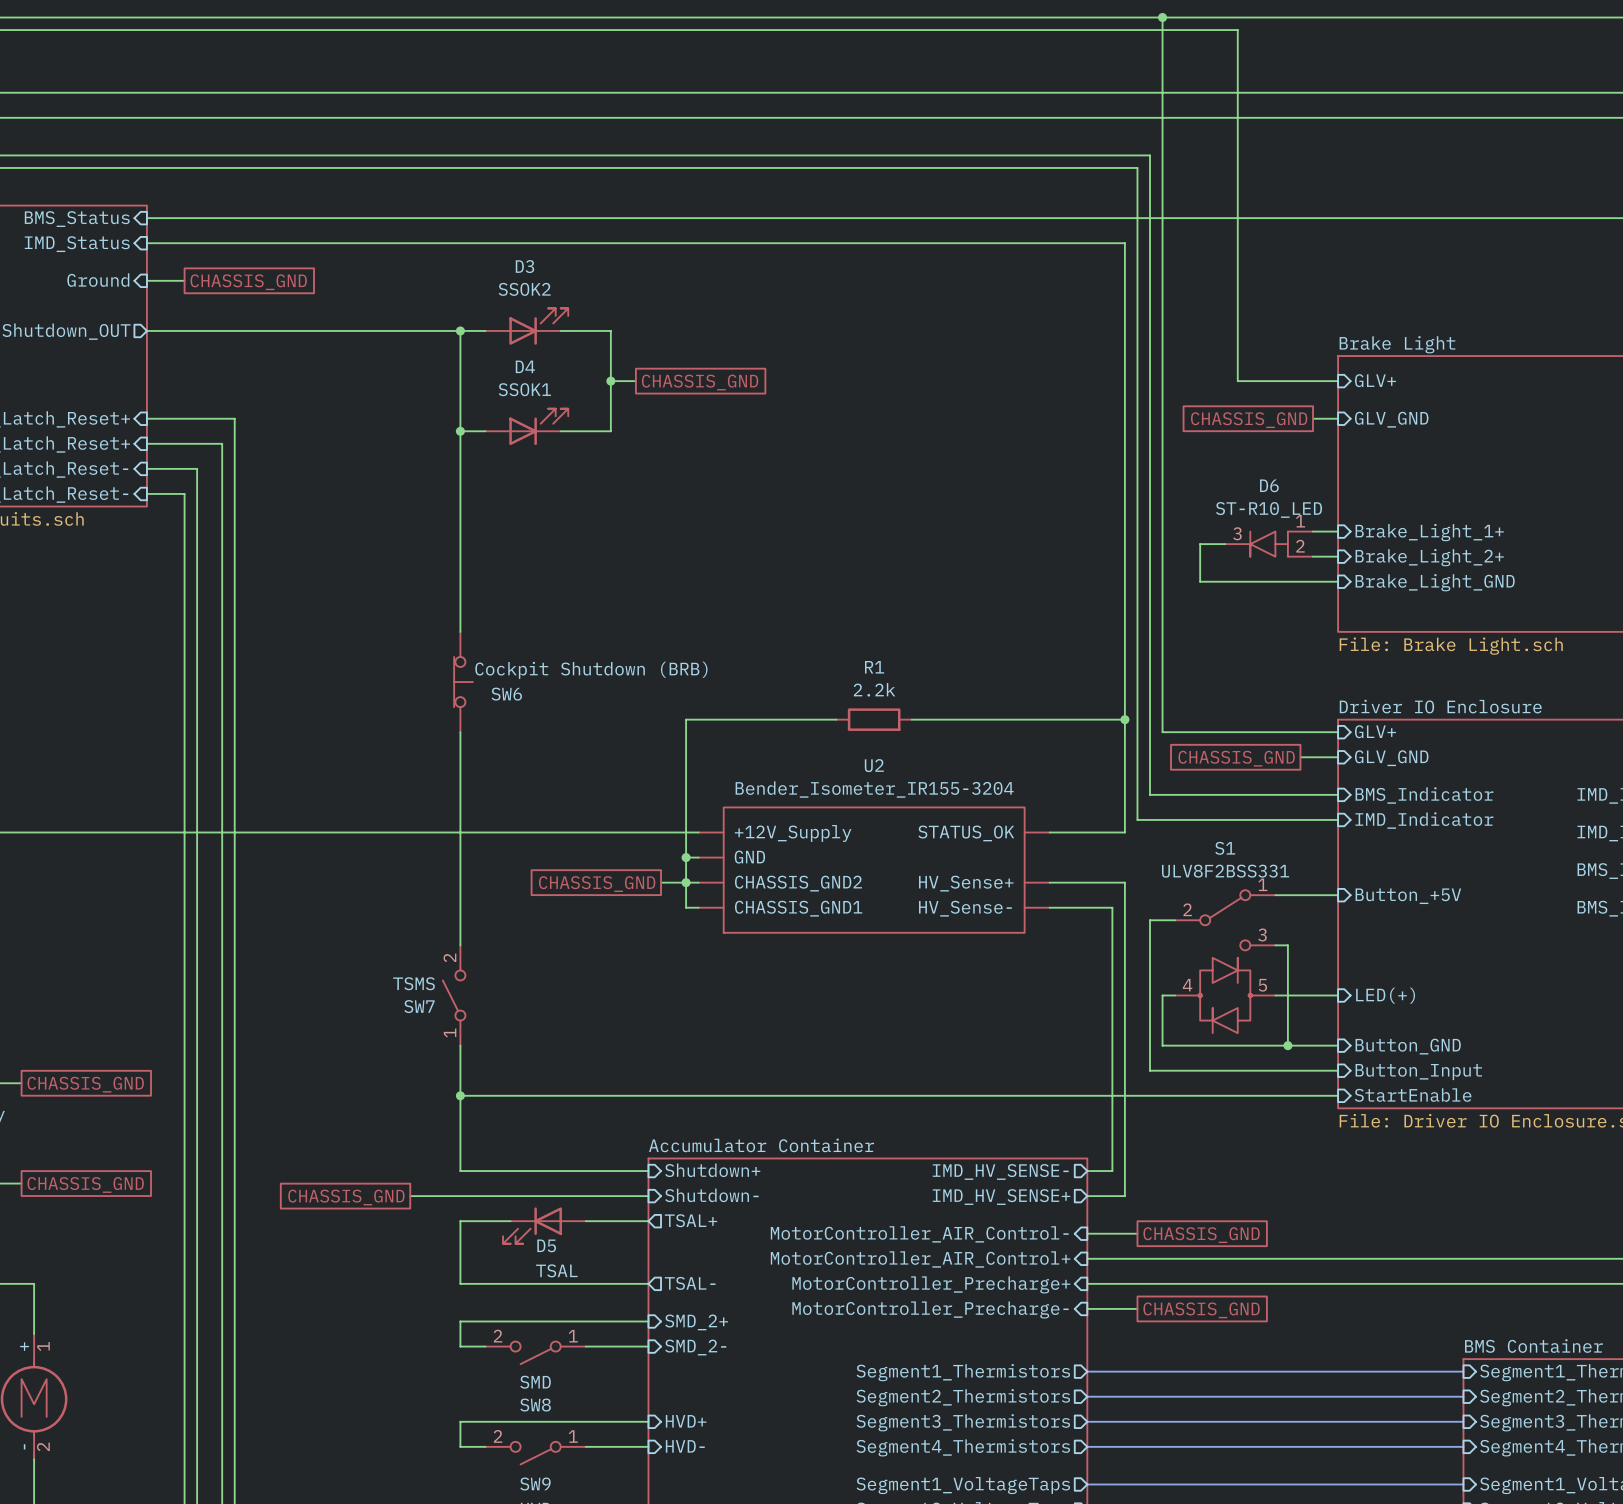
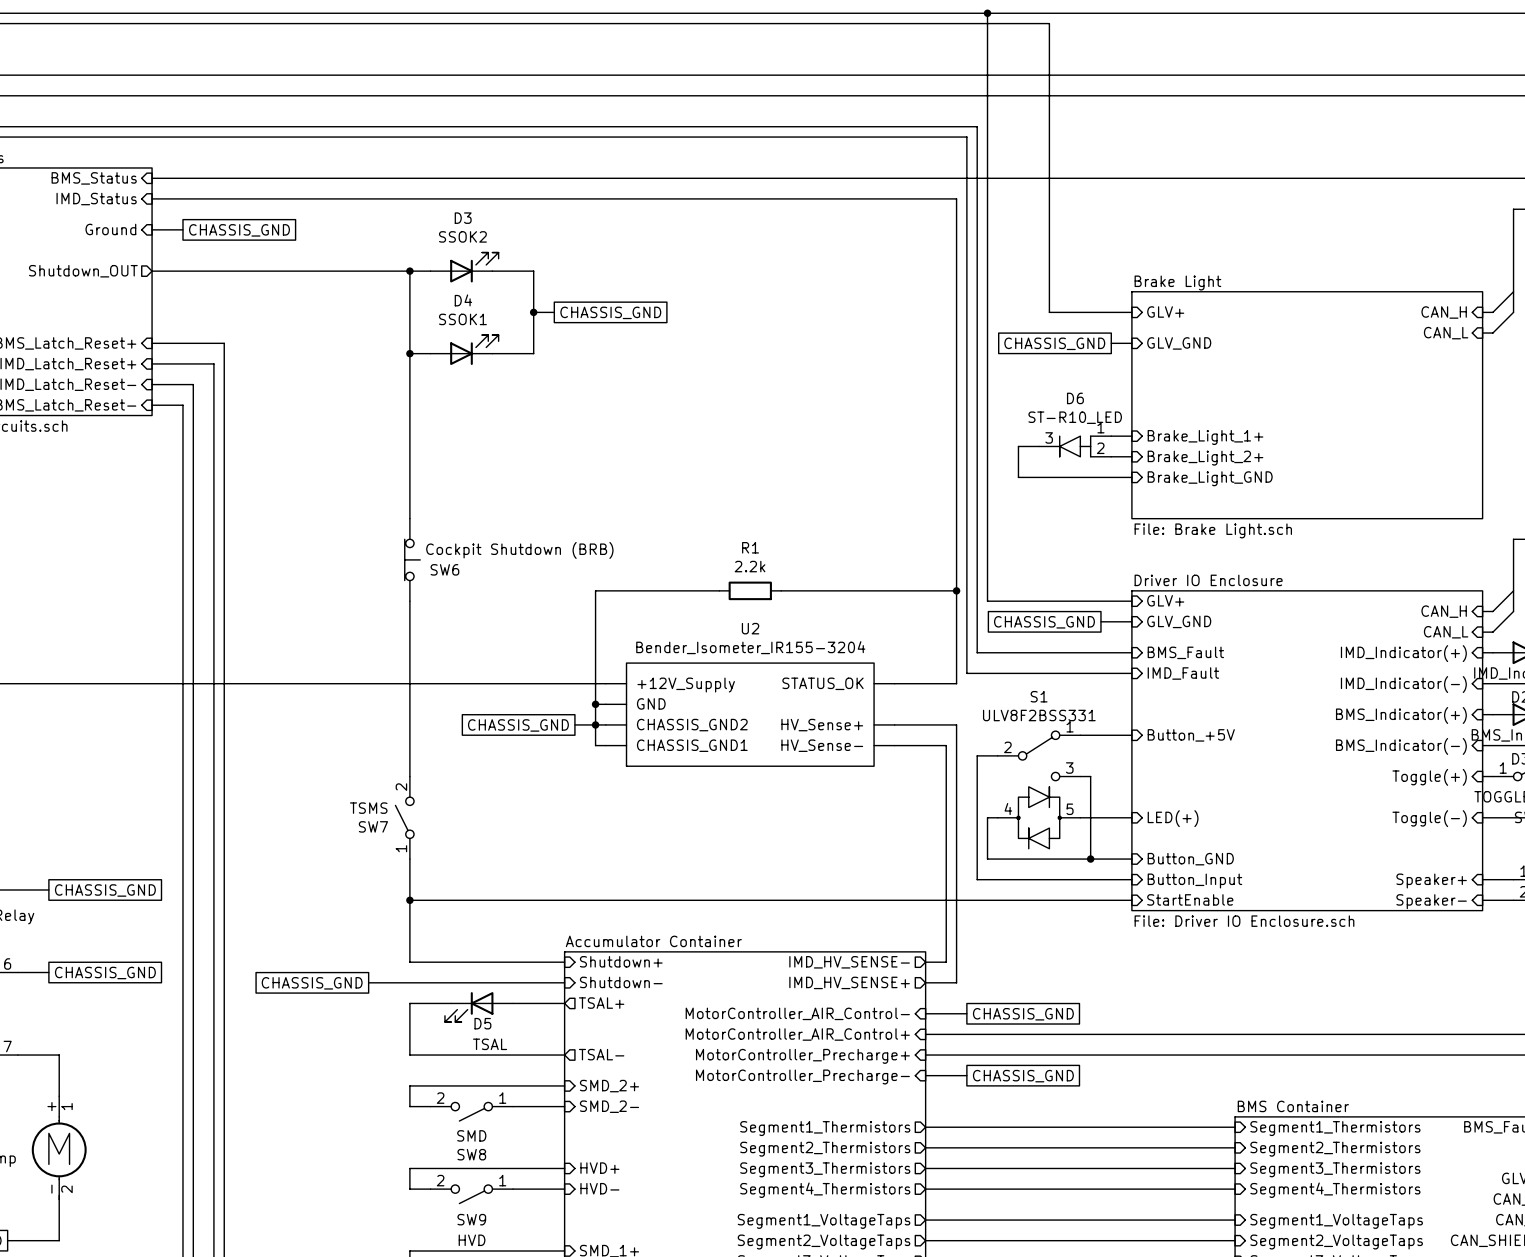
sheet pin: BMS_Indicator (1424, 795) -> BMS_Fault (1185, 652)
sheet pin: IMD_Indicator (1424, 820) -> IMD_Fault (1183, 673)

